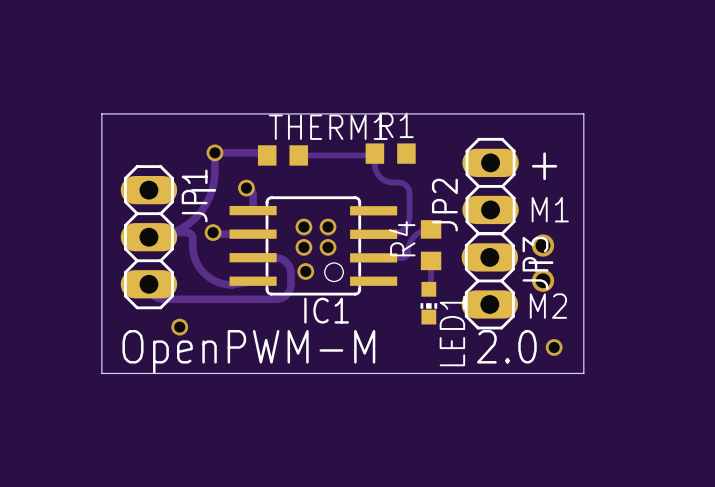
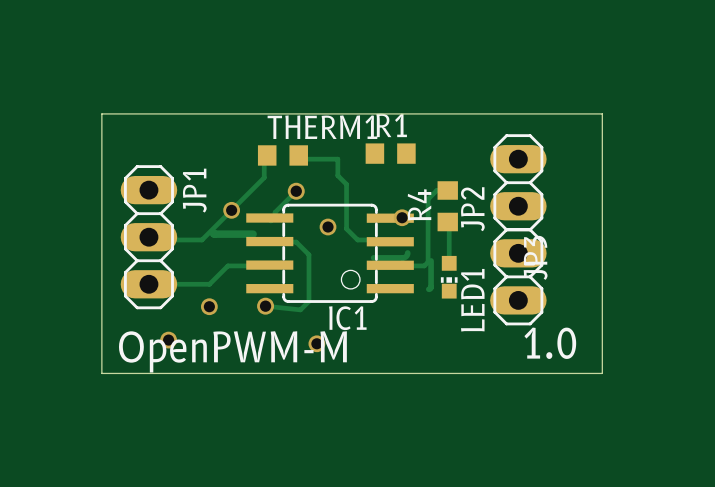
board edge: (583, 113) (583, 373) -> (583, 113) (602, 113) (602, 373) (583, 373)
via: (214, 152) -> none
track: (267, 155) (263, 152) (214, 152) (212, 188) (201, 211) (189, 223) (174, 232) (166, 234) (157, 236) (148, 236) (152, 232) (153, 232) (187, 232) (189, 232) (192, 236) (195, 260) (208, 276) (226, 284) (253, 281) -> none
track: (298, 155) (373, 155) (374, 153) (375, 169) (380, 177) (388, 181) (401, 182) (406, 185) (409, 192) (409, 215) (405, 227) (395, 233) (373, 234) -> none
track: none -> (267, 159) (264, 162) (264, 177) (201, 239) (151, 239) (148, 237)
track: none -> (298, 159) (337, 159) (337, 175) (346, 184) (346, 228) (357, 239) (388, 239) (390, 241)
text: + (544, 166) -> none
JP2 position: (490, 186) -> (518, 182)
track: (246, 188) (252, 193) (253, 210) -> none
via: (246, 188) -> none
text: - (203, 190) -> none
track: none -> (447, 190) (436, 190) (428, 199) (428, 262) (424, 265) (390, 265)
track: none -> (296, 191) (275, 212) (275, 216) (270, 220) (269, 218)
via: none -> (296, 191)
text: M1 (550, 209) -> none
via: none -> (231, 210)
via: none -> (402, 217)
track: none -> (447, 222) (449, 263)
via: (303, 227) -> none
track: (431, 229) (422, 231) (414, 236) (409, 243) (407, 252) -> none
via: (213, 232) -> none
track: none -> (269, 241) (296, 242) (308, 254) (308, 301) (300, 309) (265, 306)
IC1 position: (313, 245) -> (330, 253)
R4 position: (431, 245) -> (447, 206)
via: (543, 245) -> none
via: (303, 247) -> none
via: (328, 247) -> none
track: (253, 257) (277, 257) (287, 263) (290, 271) (290, 286) (285, 296) (276, 299) (162, 299) (152, 293) (148, 284) -> (269, 265) (227, 265) (209, 284) (148, 284)
via: (305, 271) -> none
JP3 position: (489, 280) -> (518, 276)
via: (543, 280) -> none
LED1 position: (428, 303) -> (449, 277)
via: none -> (209, 306)
via: none -> (265, 306)
text: M2 (548, 306) -> none
via position: (179, 327) -> (168, 340)
via: none -> (316, 343)
text: 2.0 (506, 346) -> 1.0 (550, 343)
via: (554, 347) -> none

